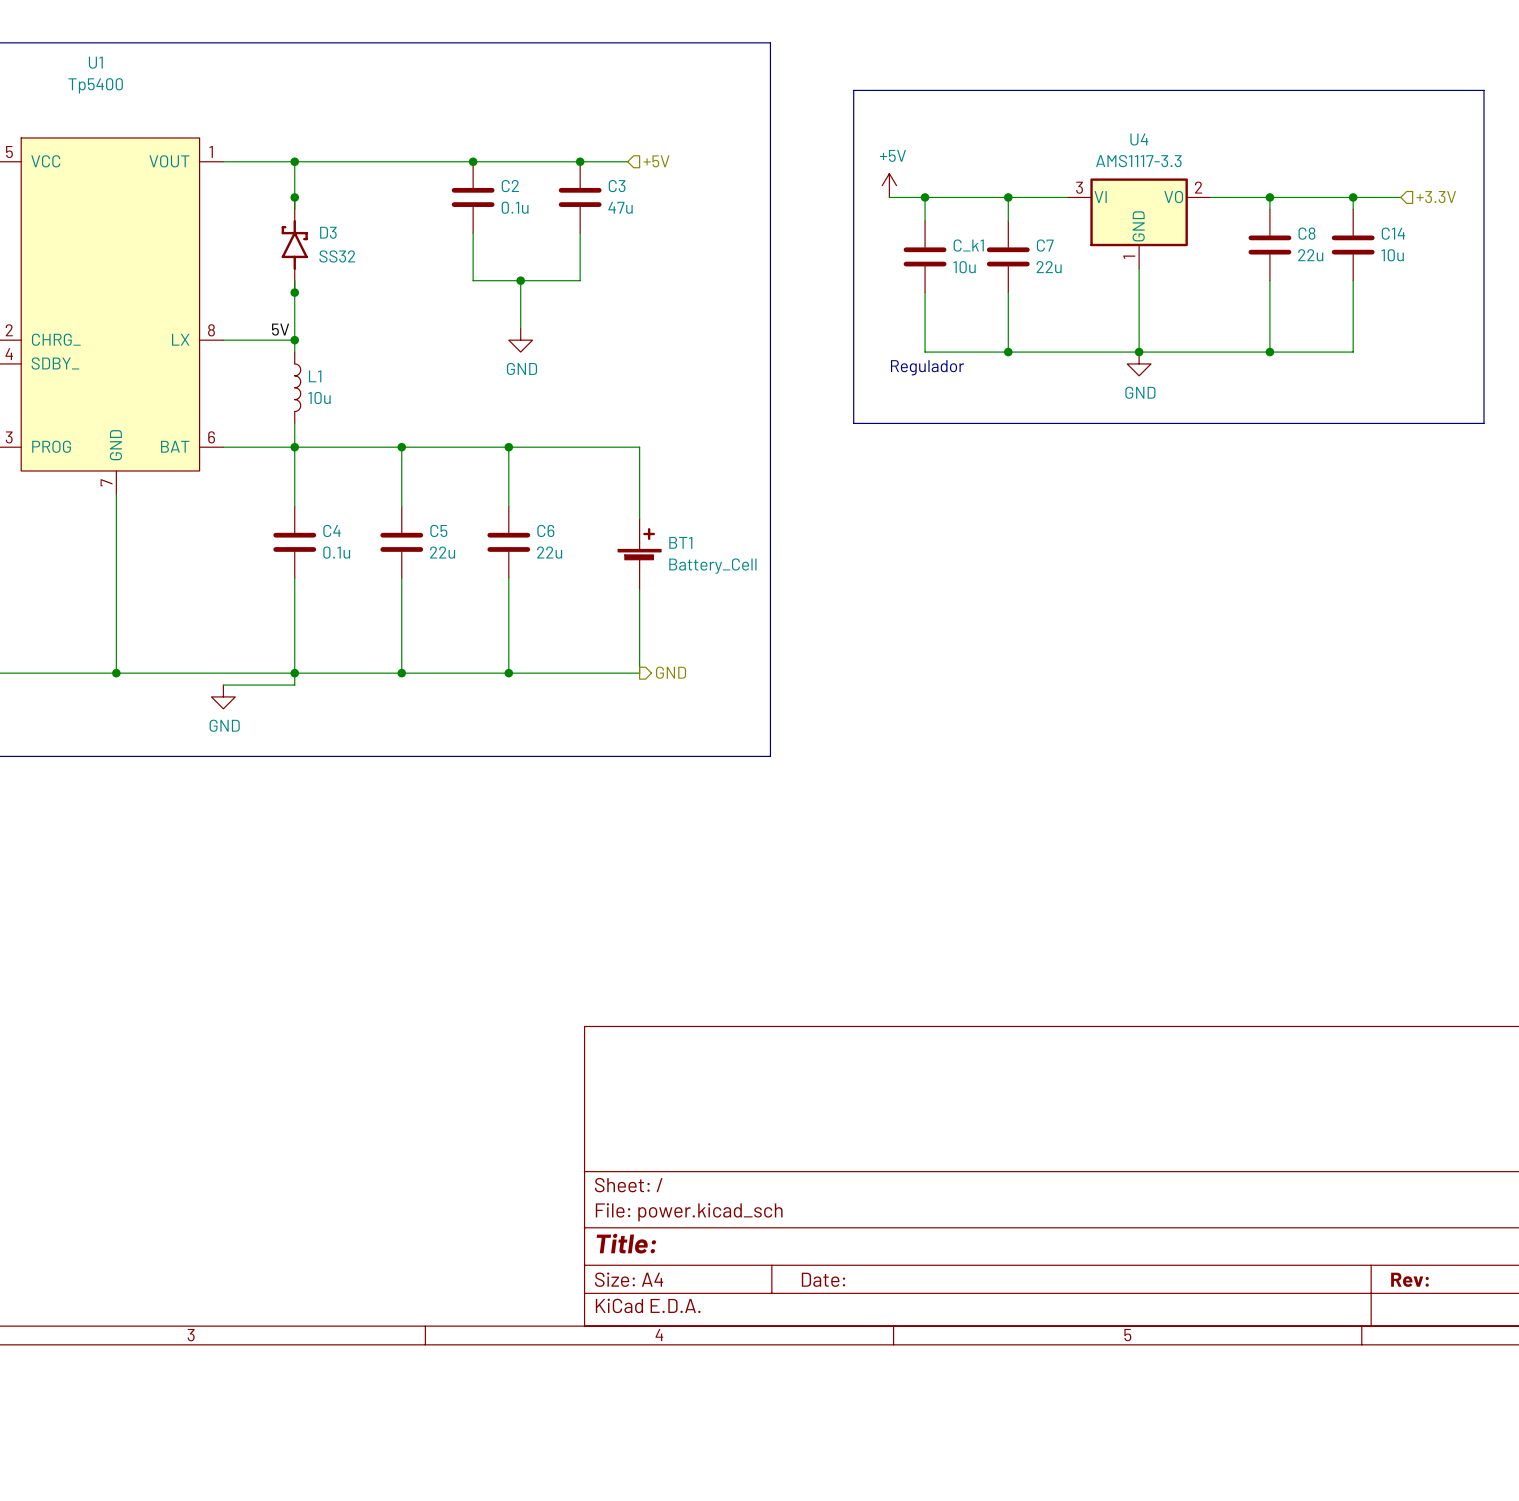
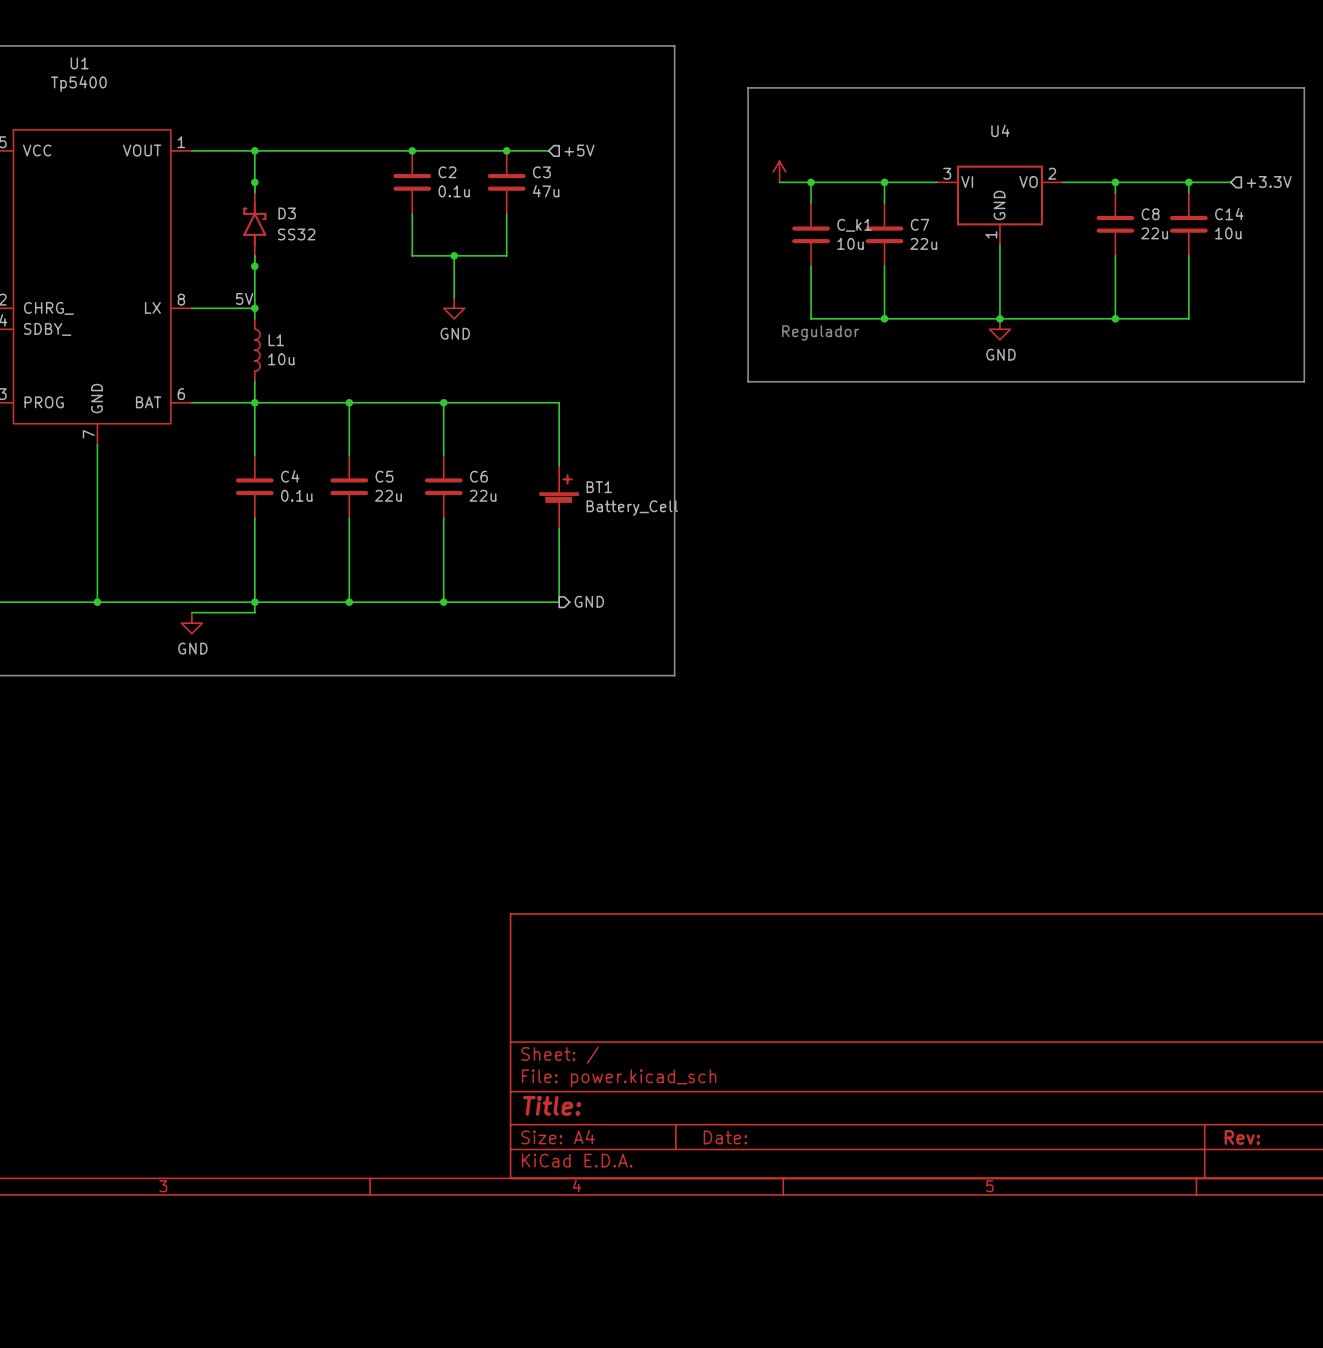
power symbol text: +5V (892, 155) -> none
U4 value: AMS1117-3.3 (1138, 161) -> none

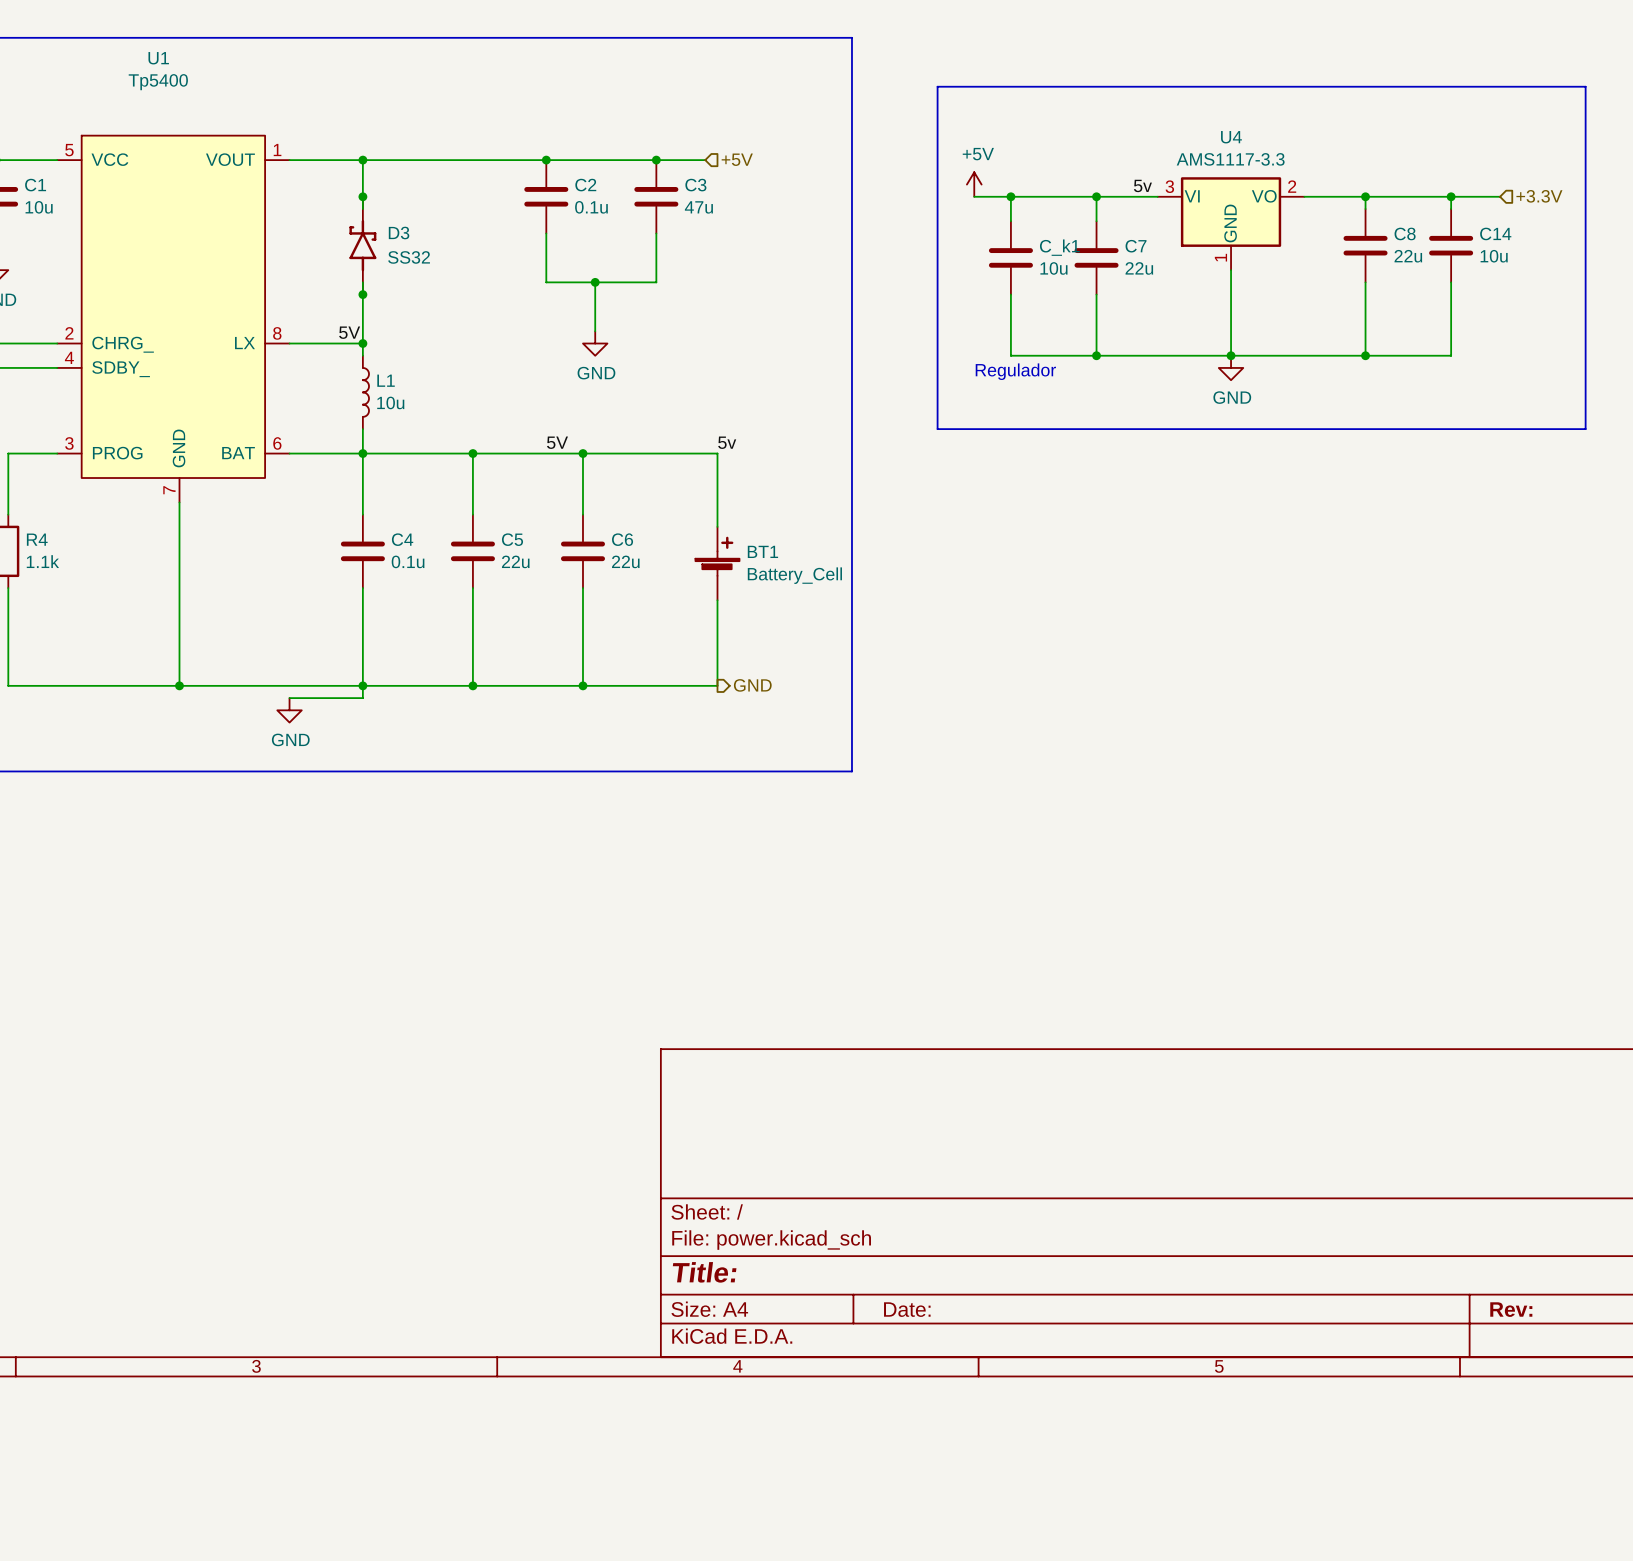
power symbol text: none -> +5V (978, 154)
U4 value: none -> AMS1117-3.3 (1230, 159)
label: none -> 5v (1142, 185)
label: none -> 5V (557, 442)
label: none -> 5v (727, 442)

